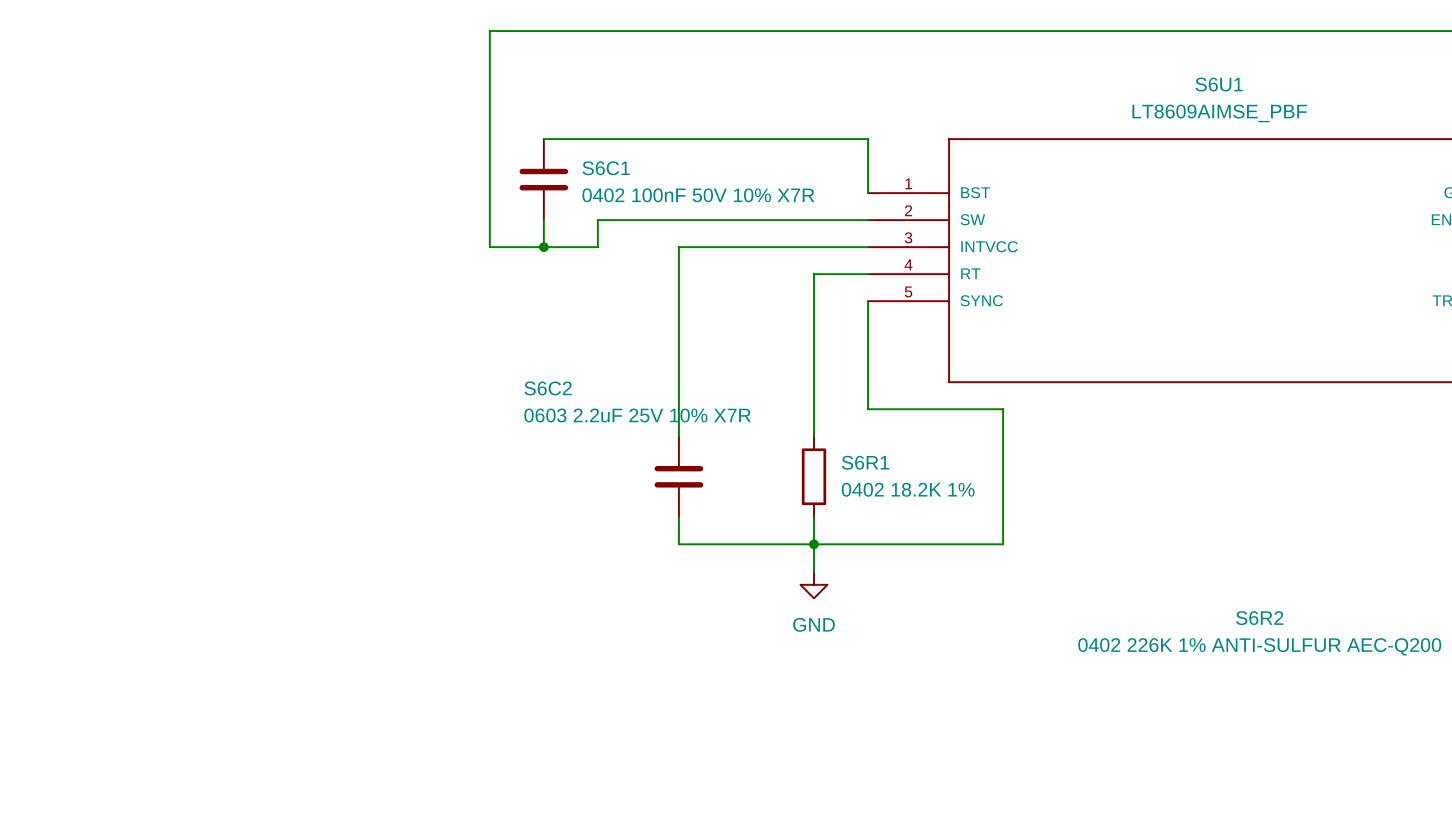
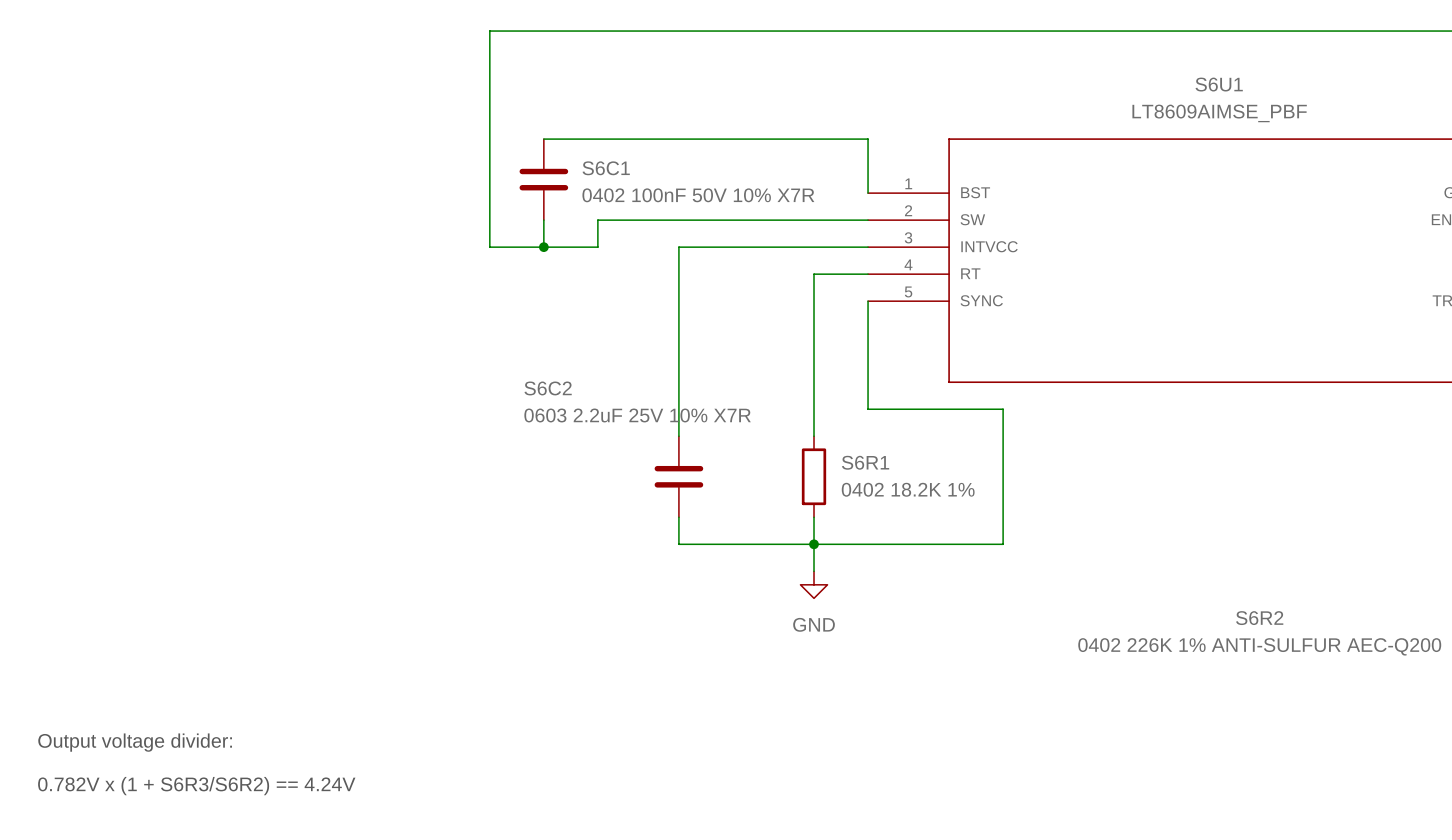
text: none -> Output voltage divider: (135, 742)
text: none -> 0.782V x (1 + S6R3/S6R2) == 4.24V (196, 786)

